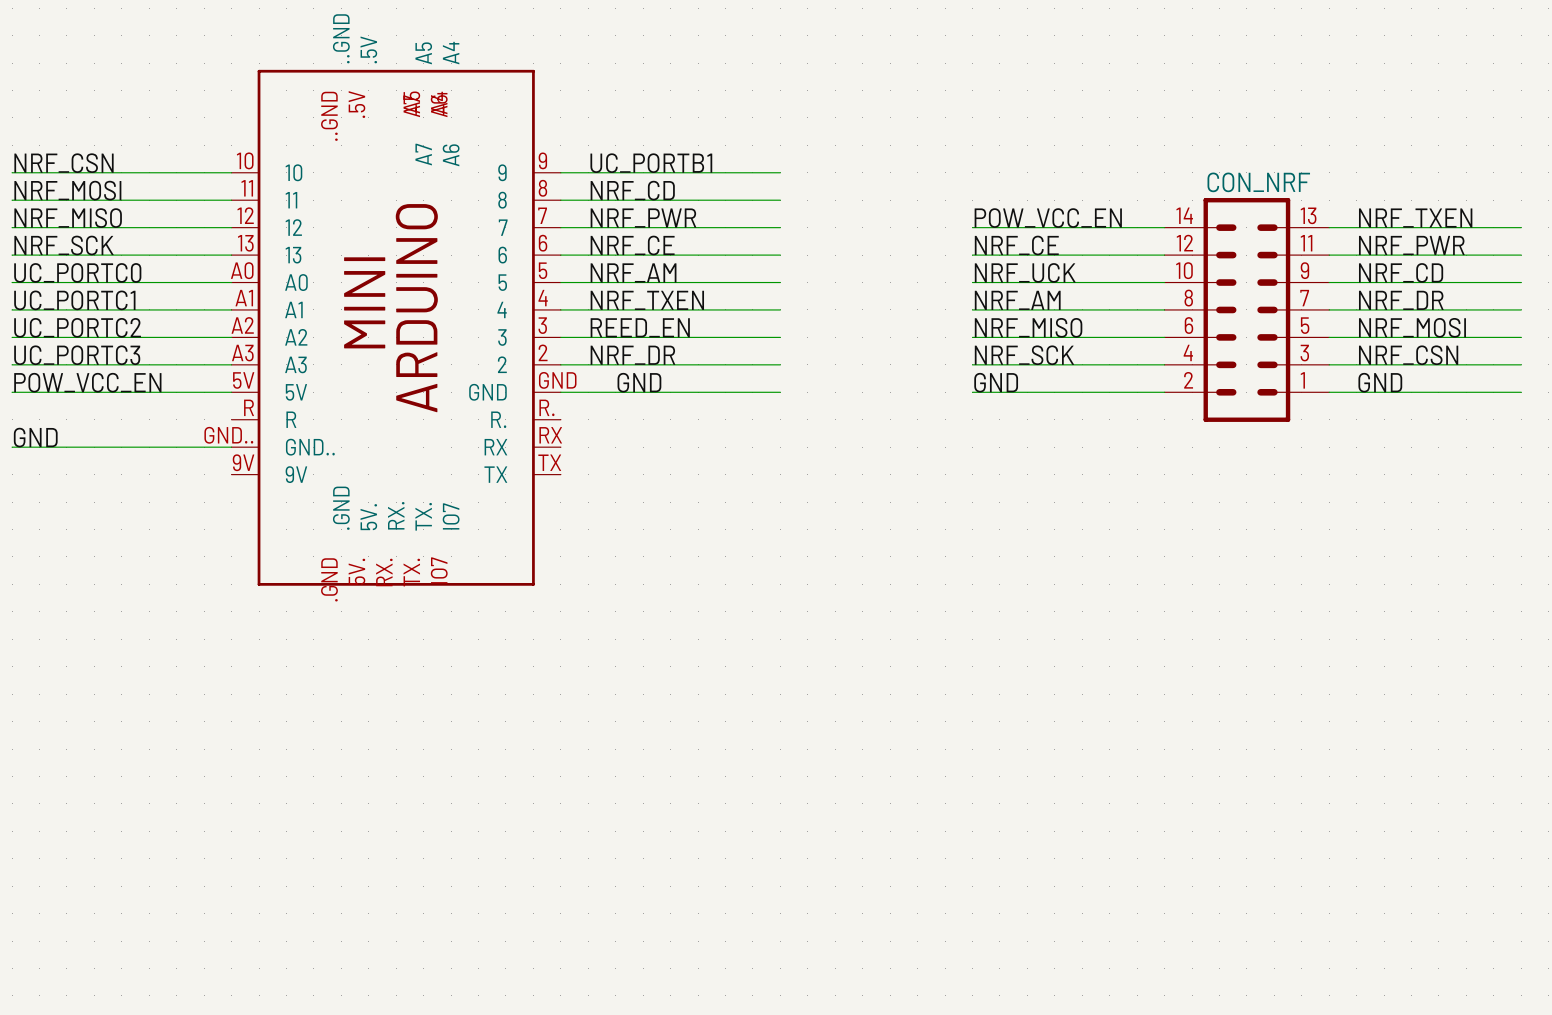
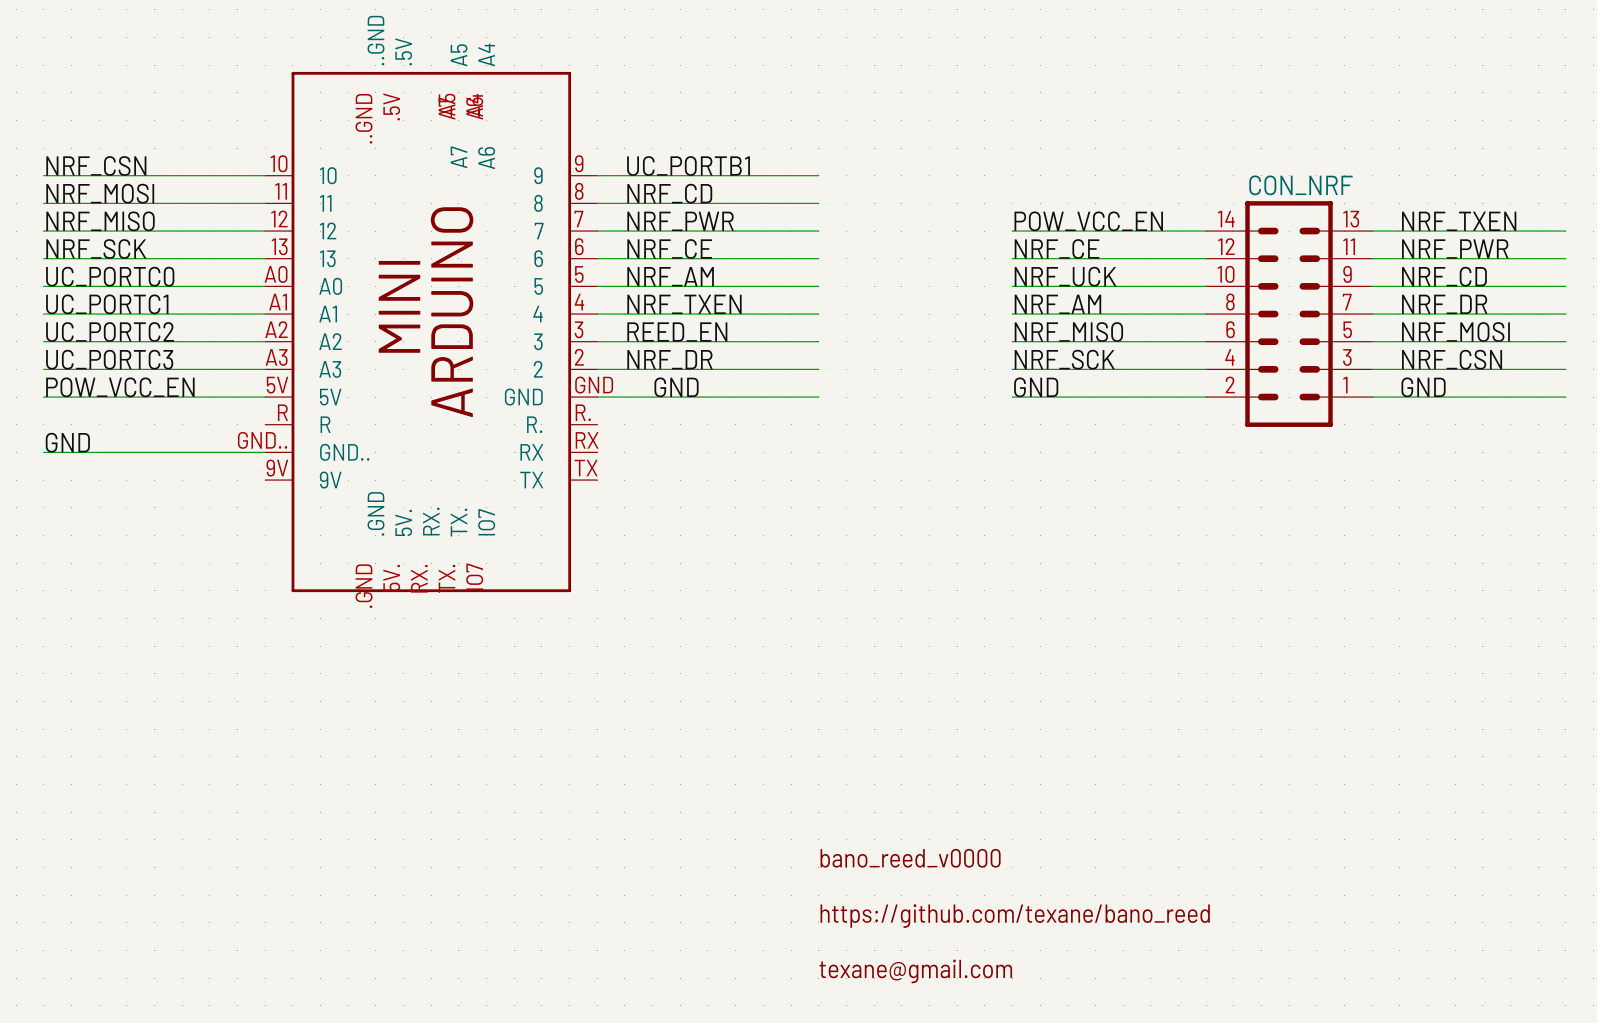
text: none -> bano_reed_v0000 (910, 858)
text: none -> https://github.com/texane/bano_reed (1015, 916)
text: none -> texane@gmail.com (915, 971)

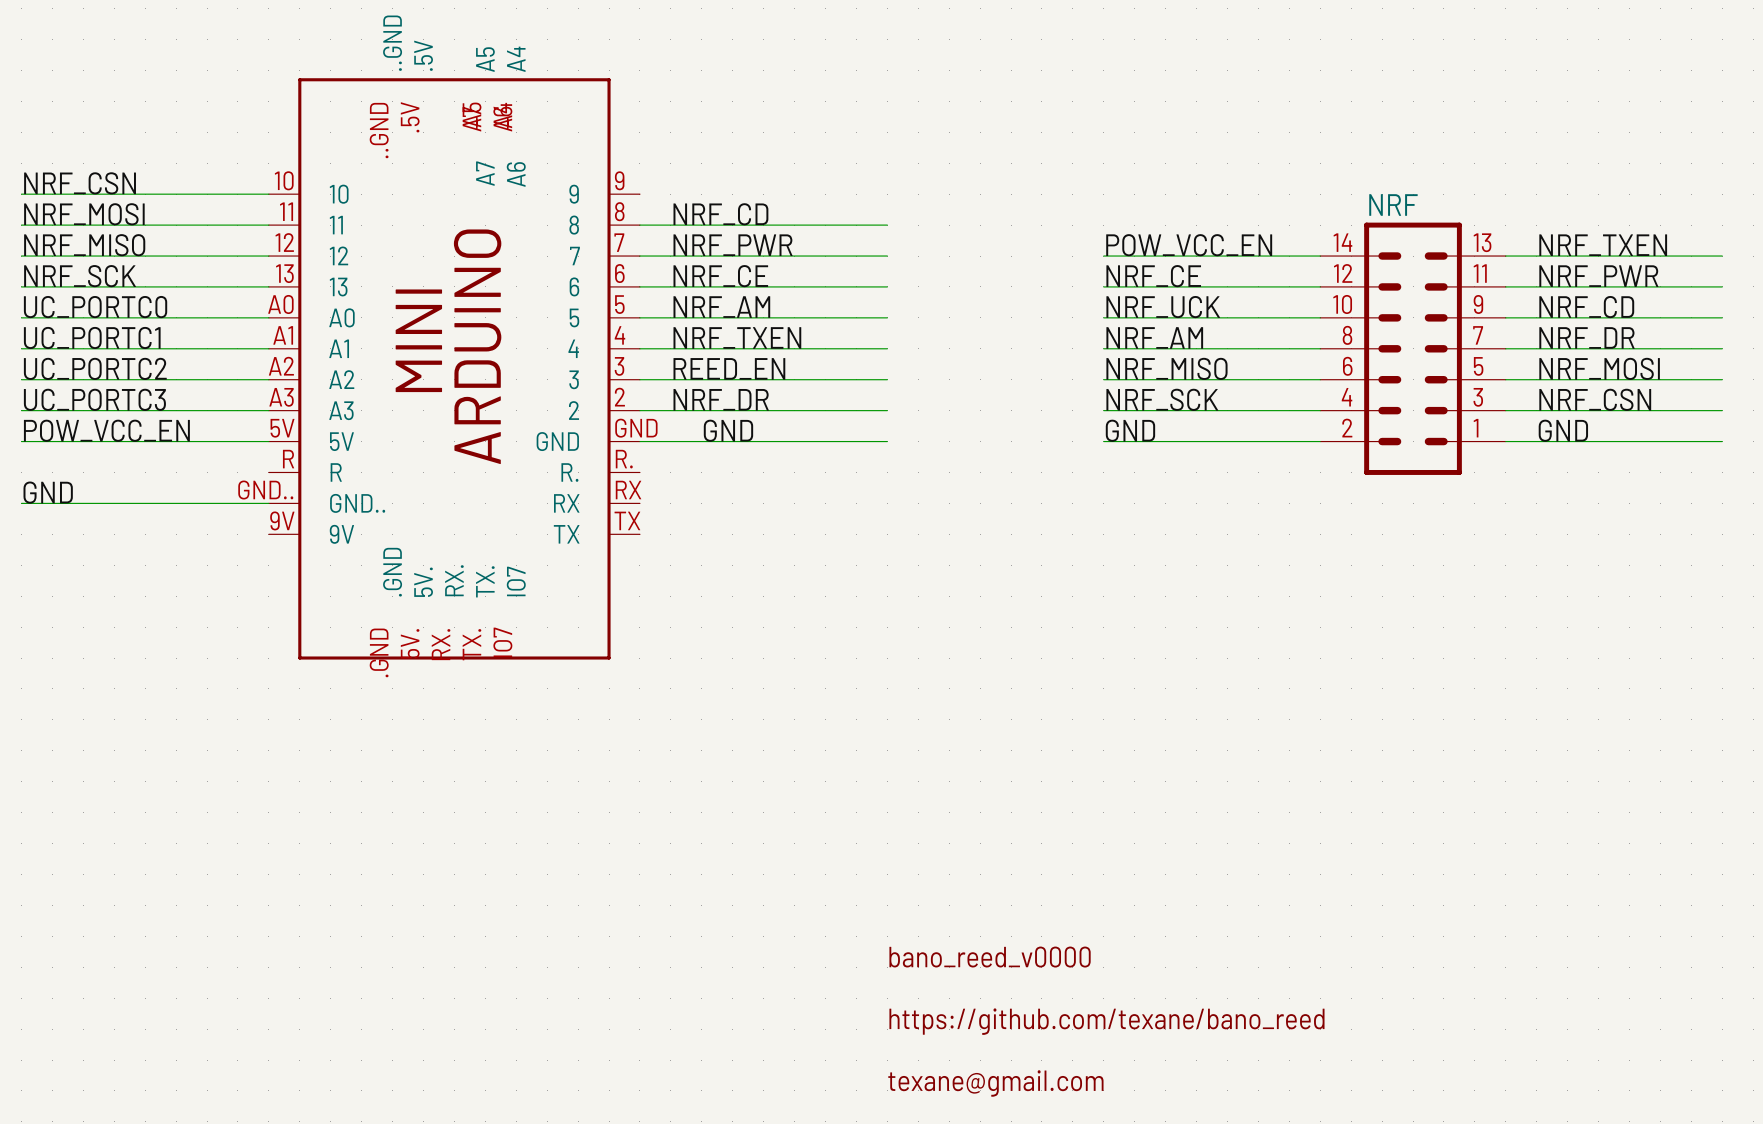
label: UC_PORTB1 (688, 166) -> none
wire: (597, 175) (818, 175) -> none
CON_NRF name: CON_NRF (1300, 185) -> NRF (1393, 204)

